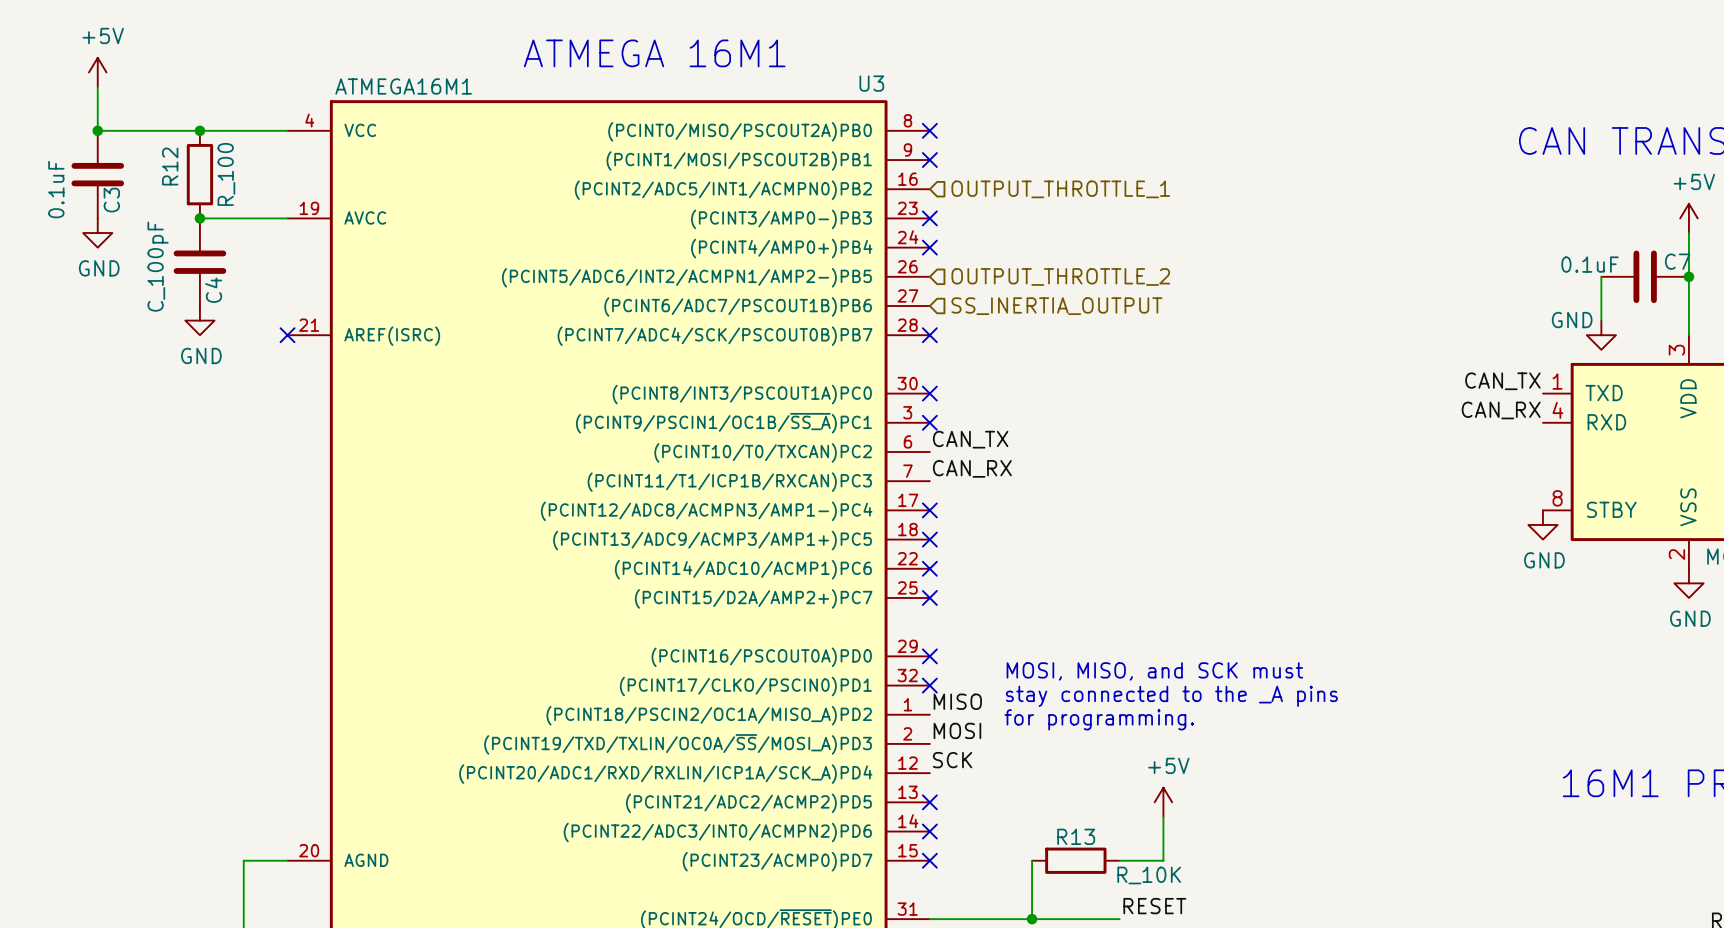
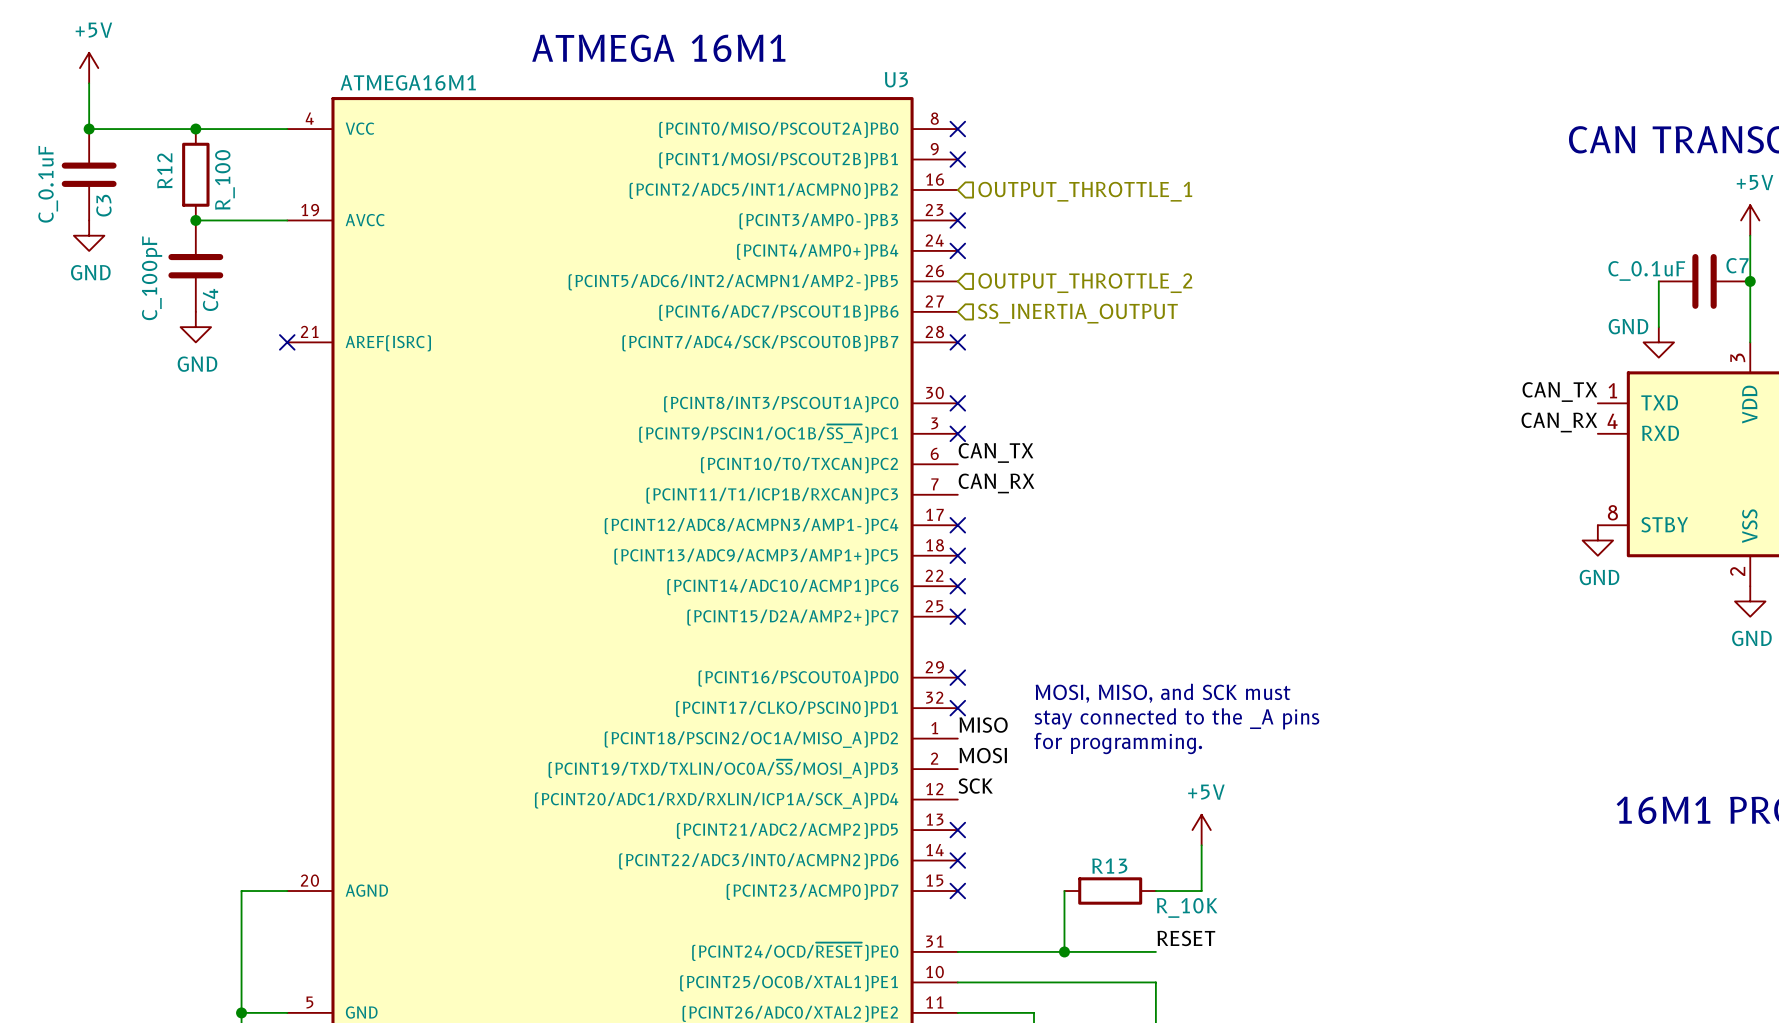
C3 value: 0.1uF (56, 189) -> C_0.1uF (48, 184)
C7 value: 0.1uF (1590, 264) -> C_0.1uF (1646, 270)

